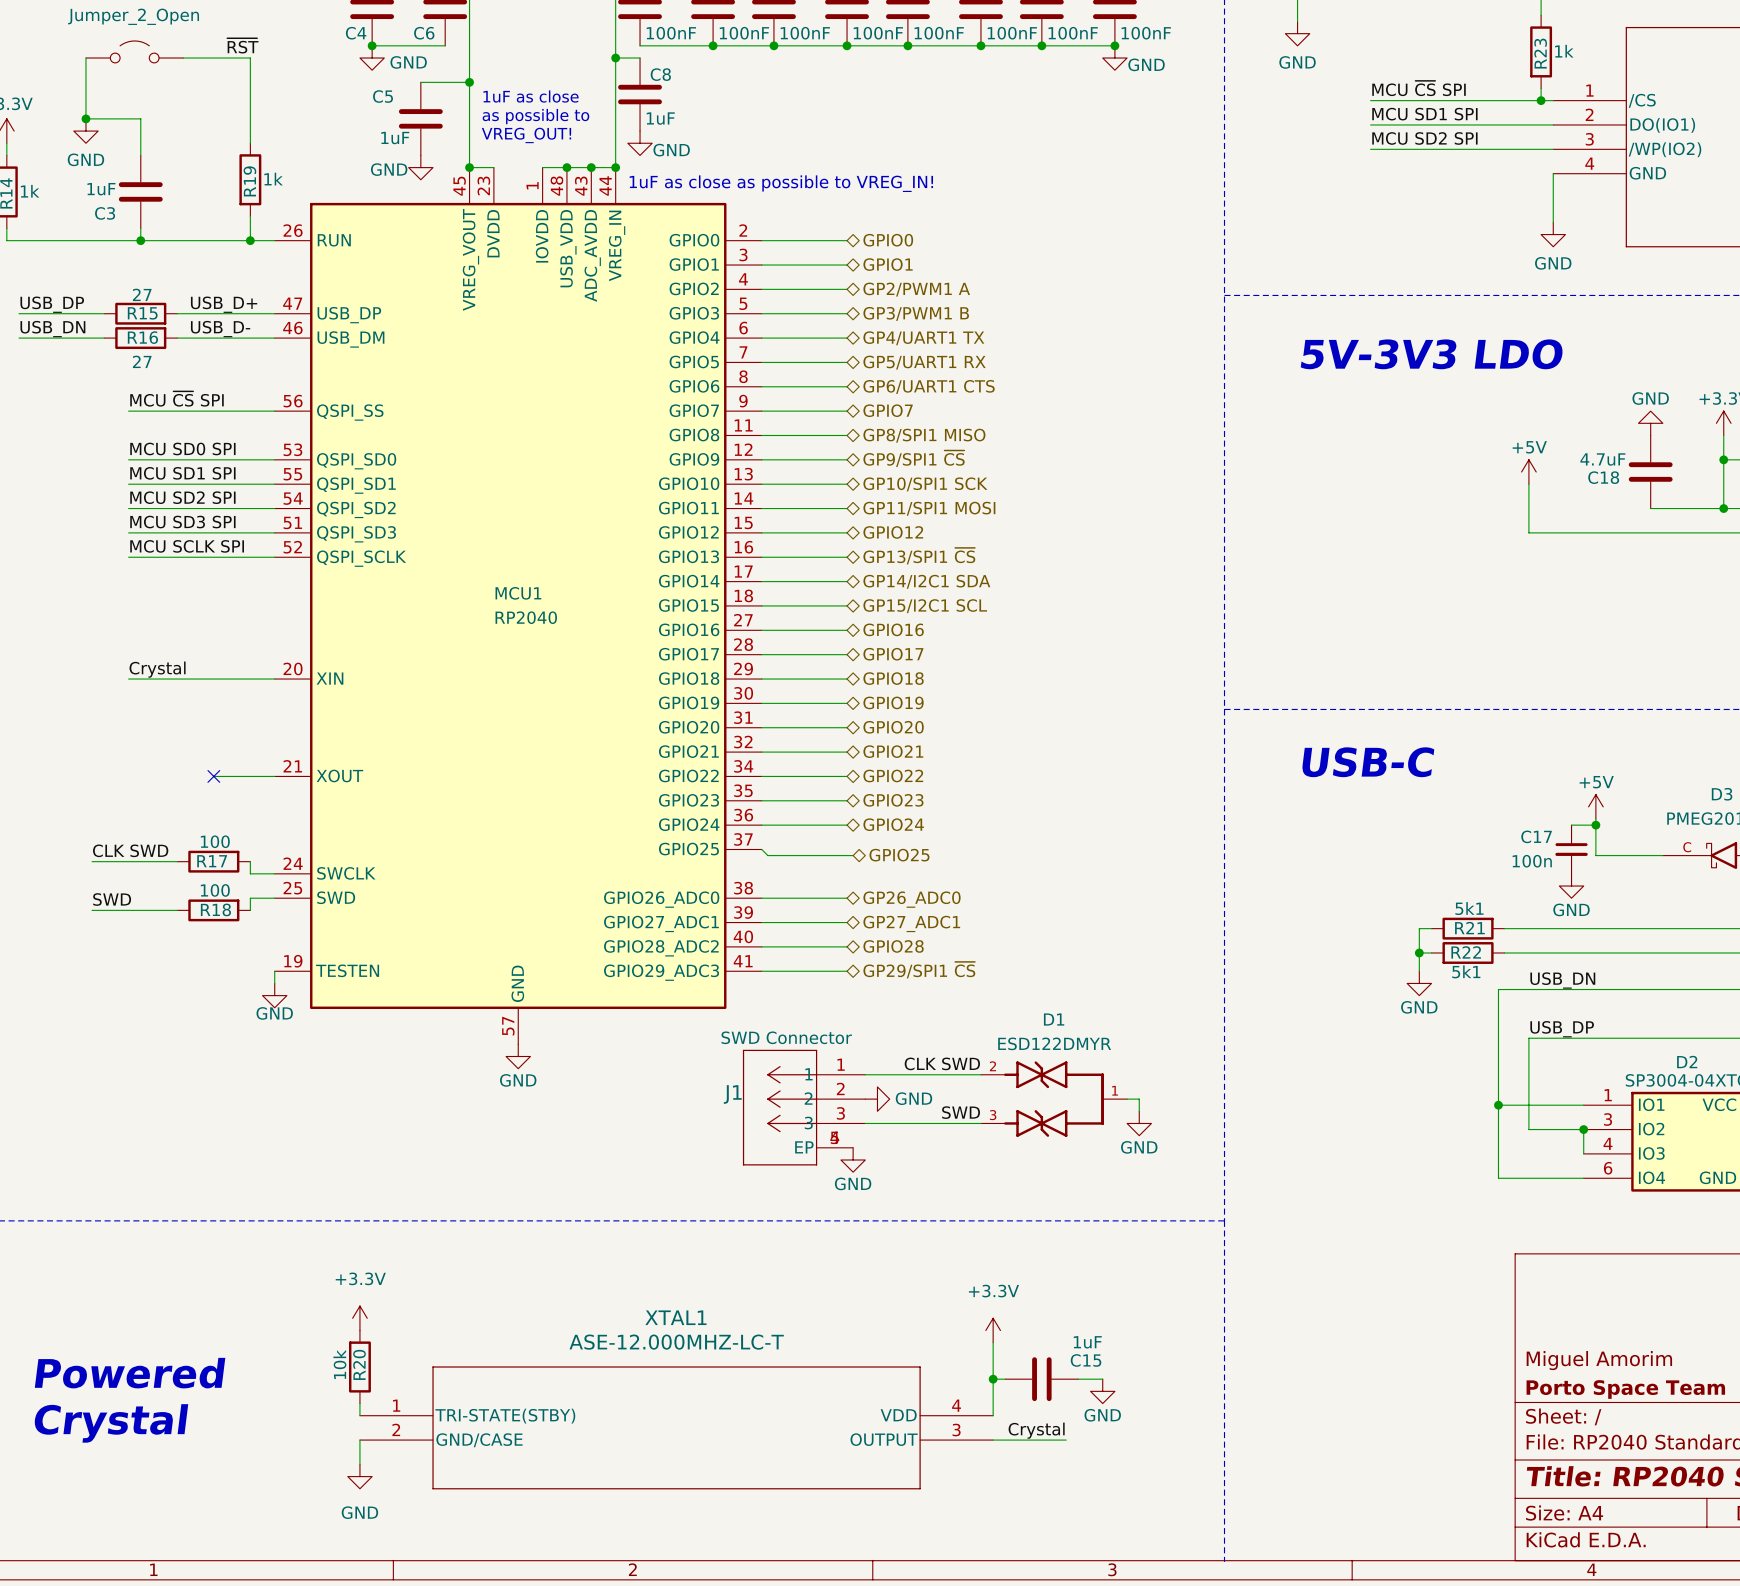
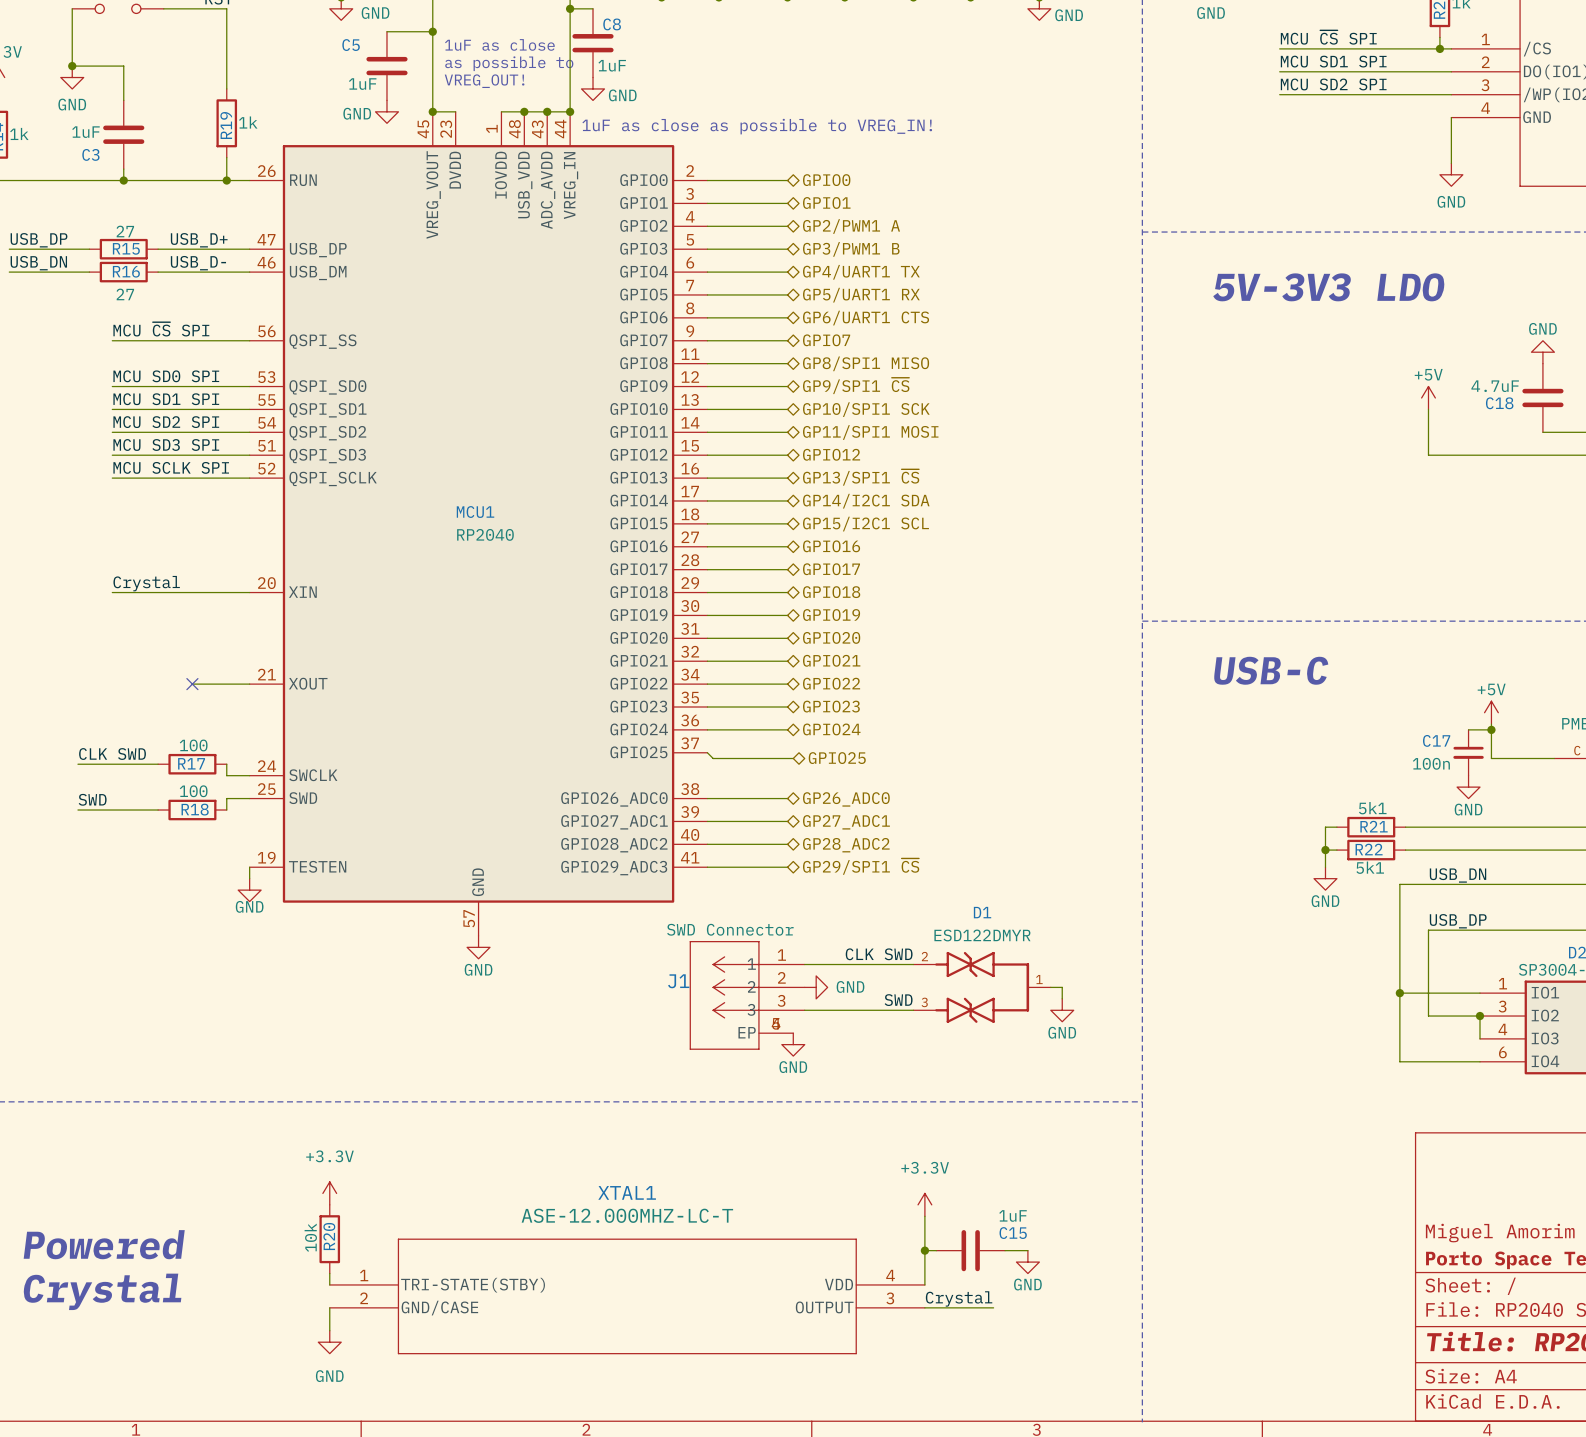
hierarchical label: GPIO28 (893, 946) -> GP28_ADC2 (846, 845)

